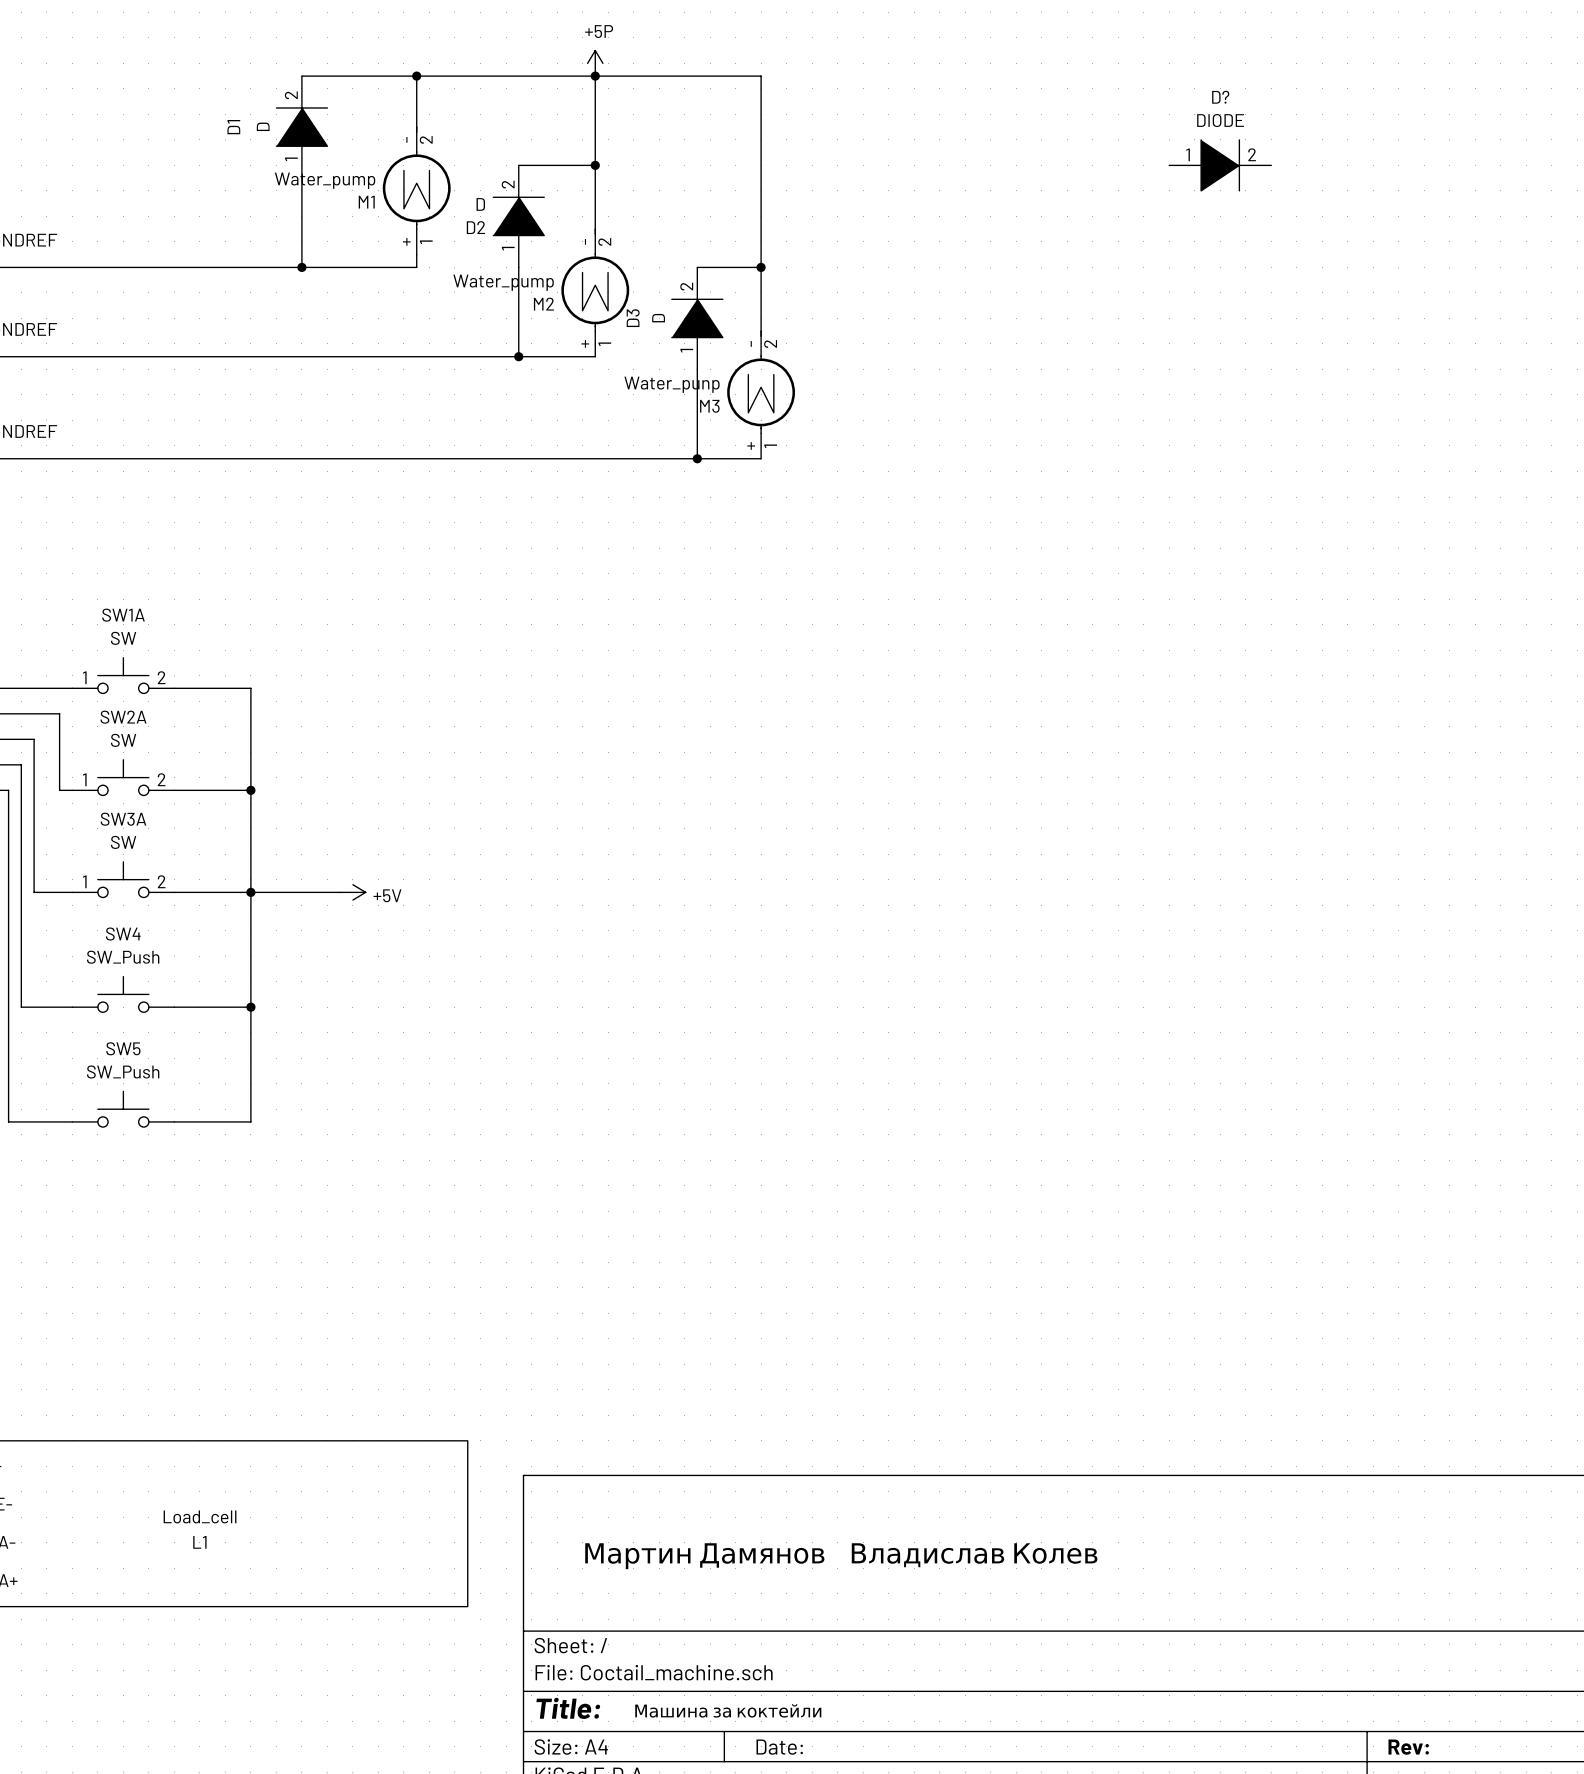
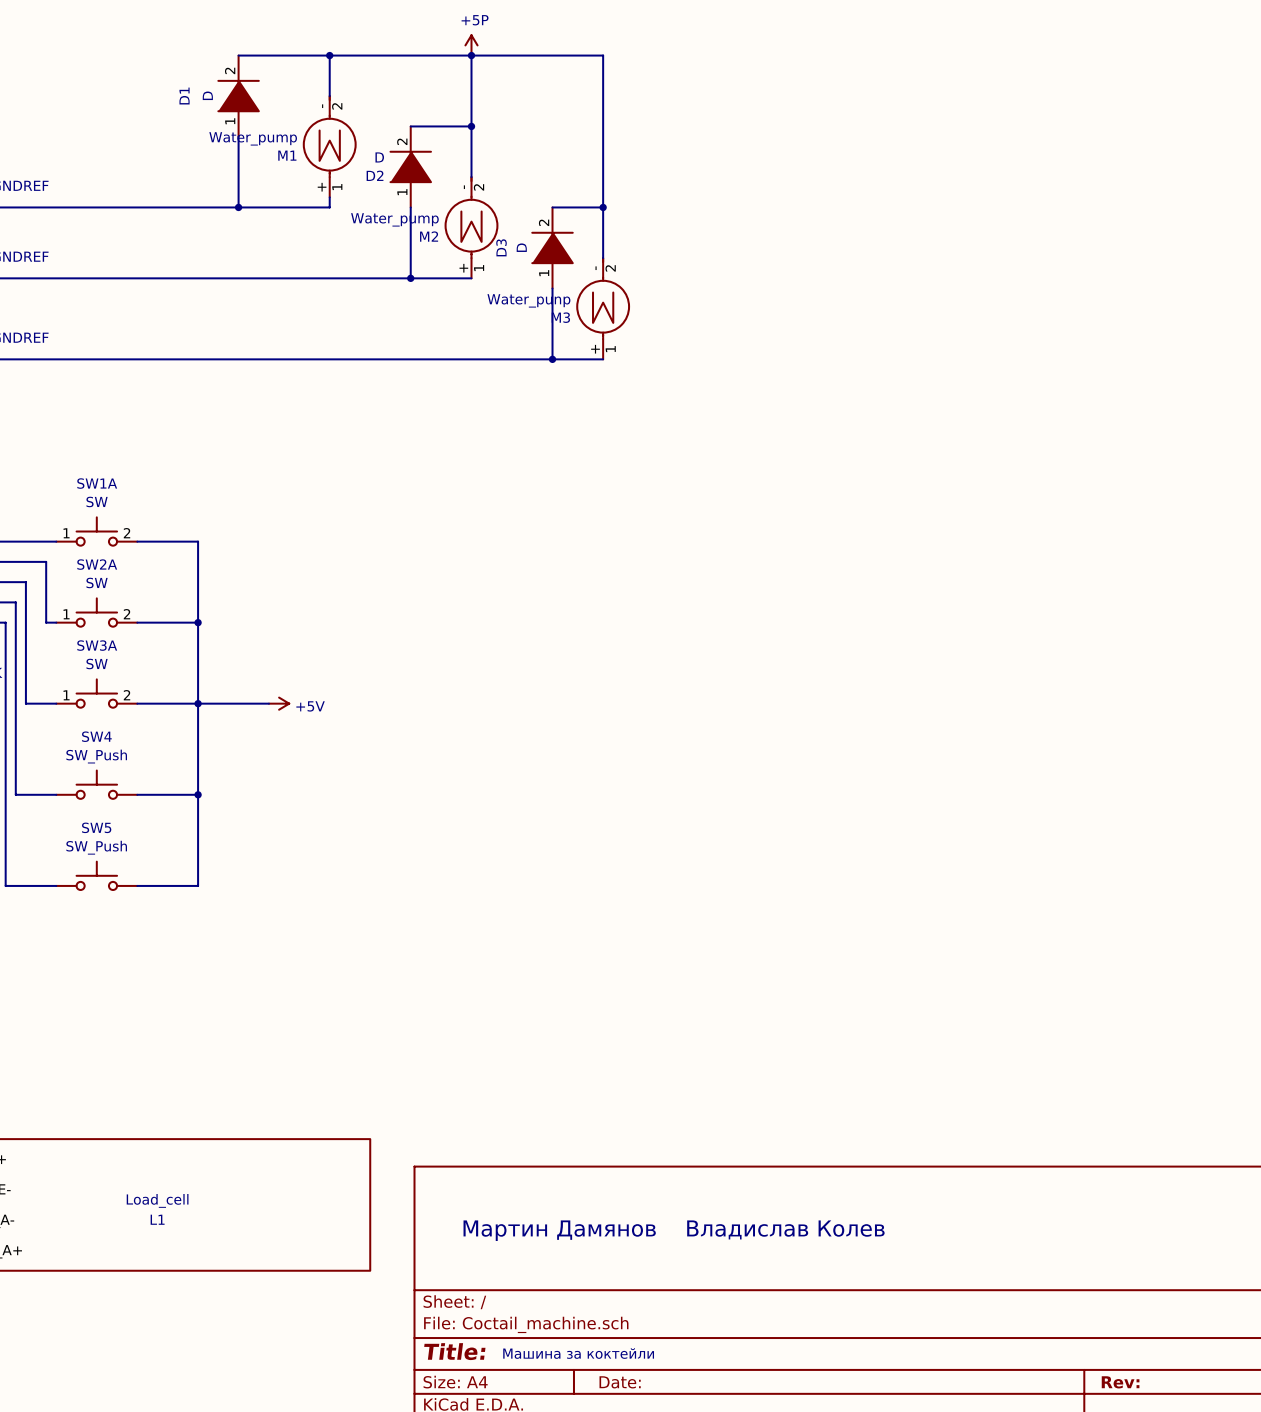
D?: DIODE (1220, 165) -> none

